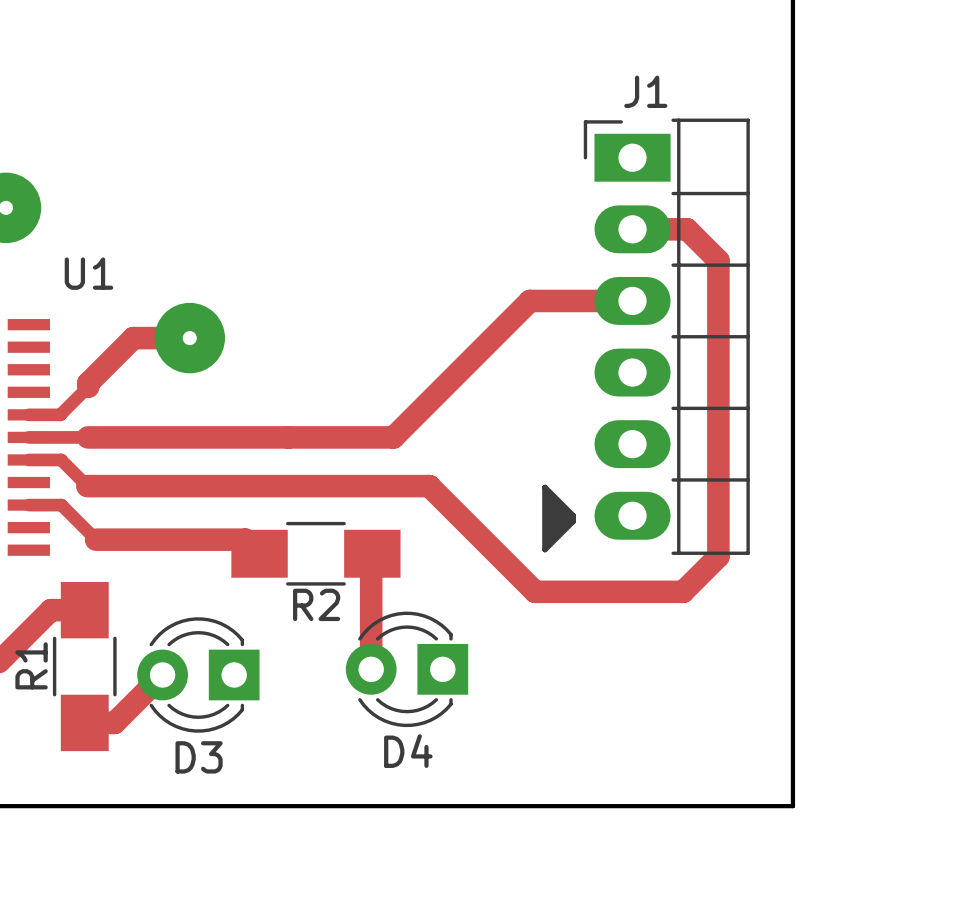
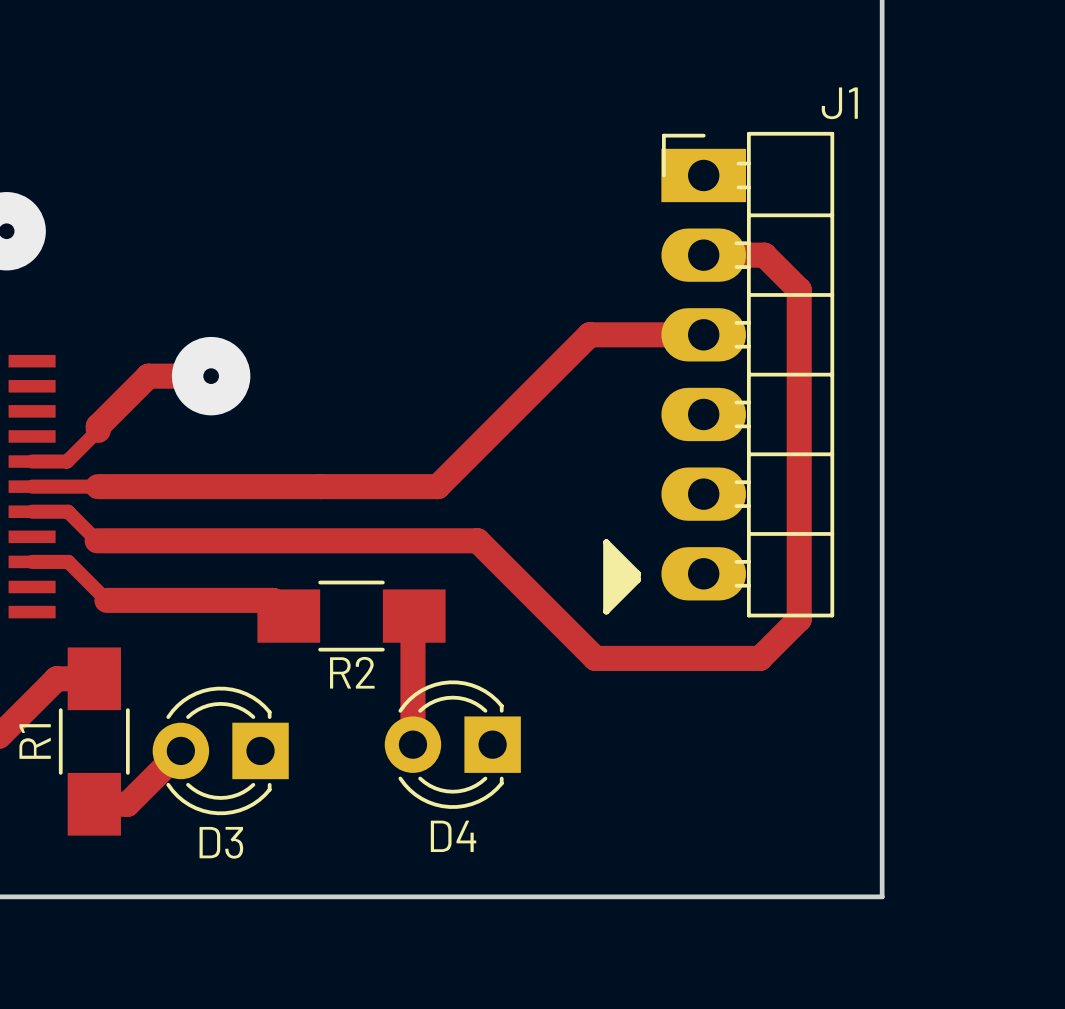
J1 name position: J1 (645, 91) -> J1 (839, 103)
J1 footprint: [583, 118, 750, 555] -> [661, 131, 835, 618]
U1 name: U1 (88, 273) -> none

